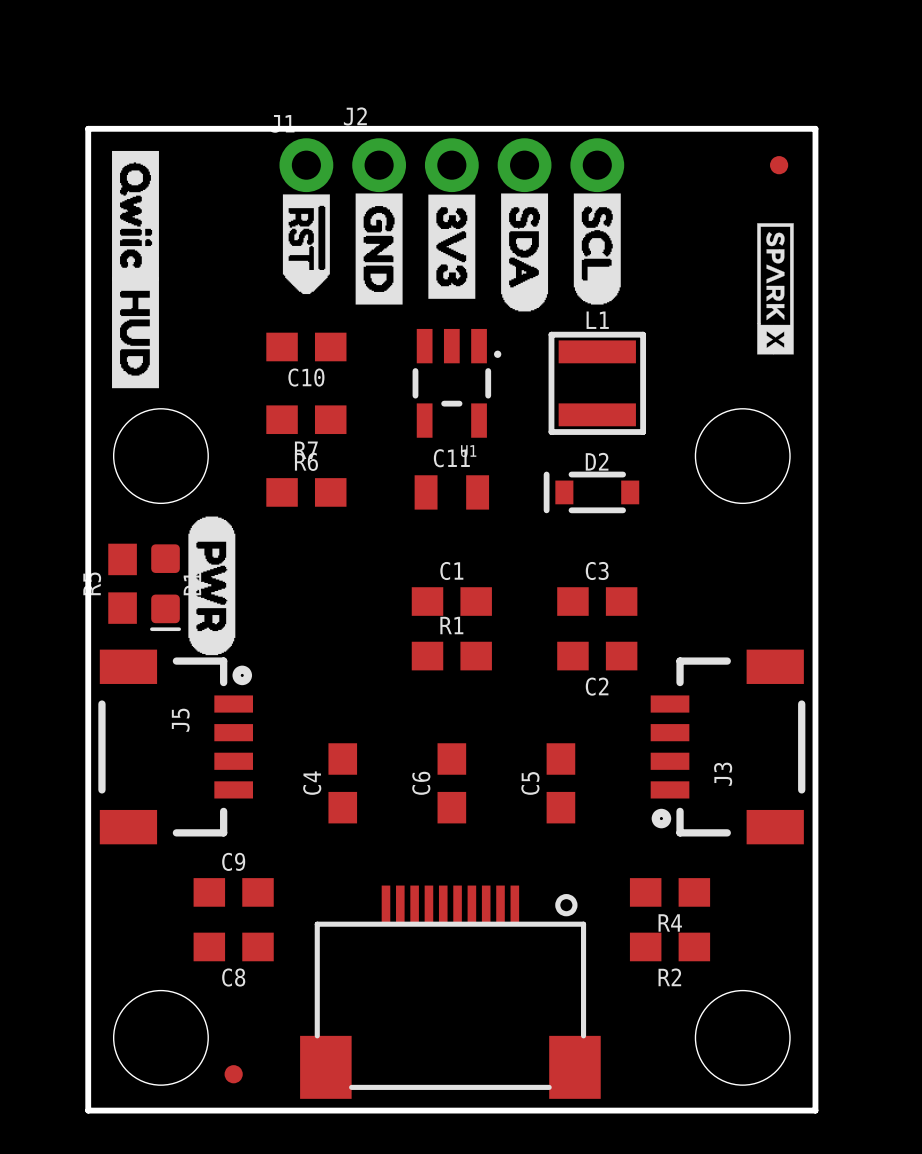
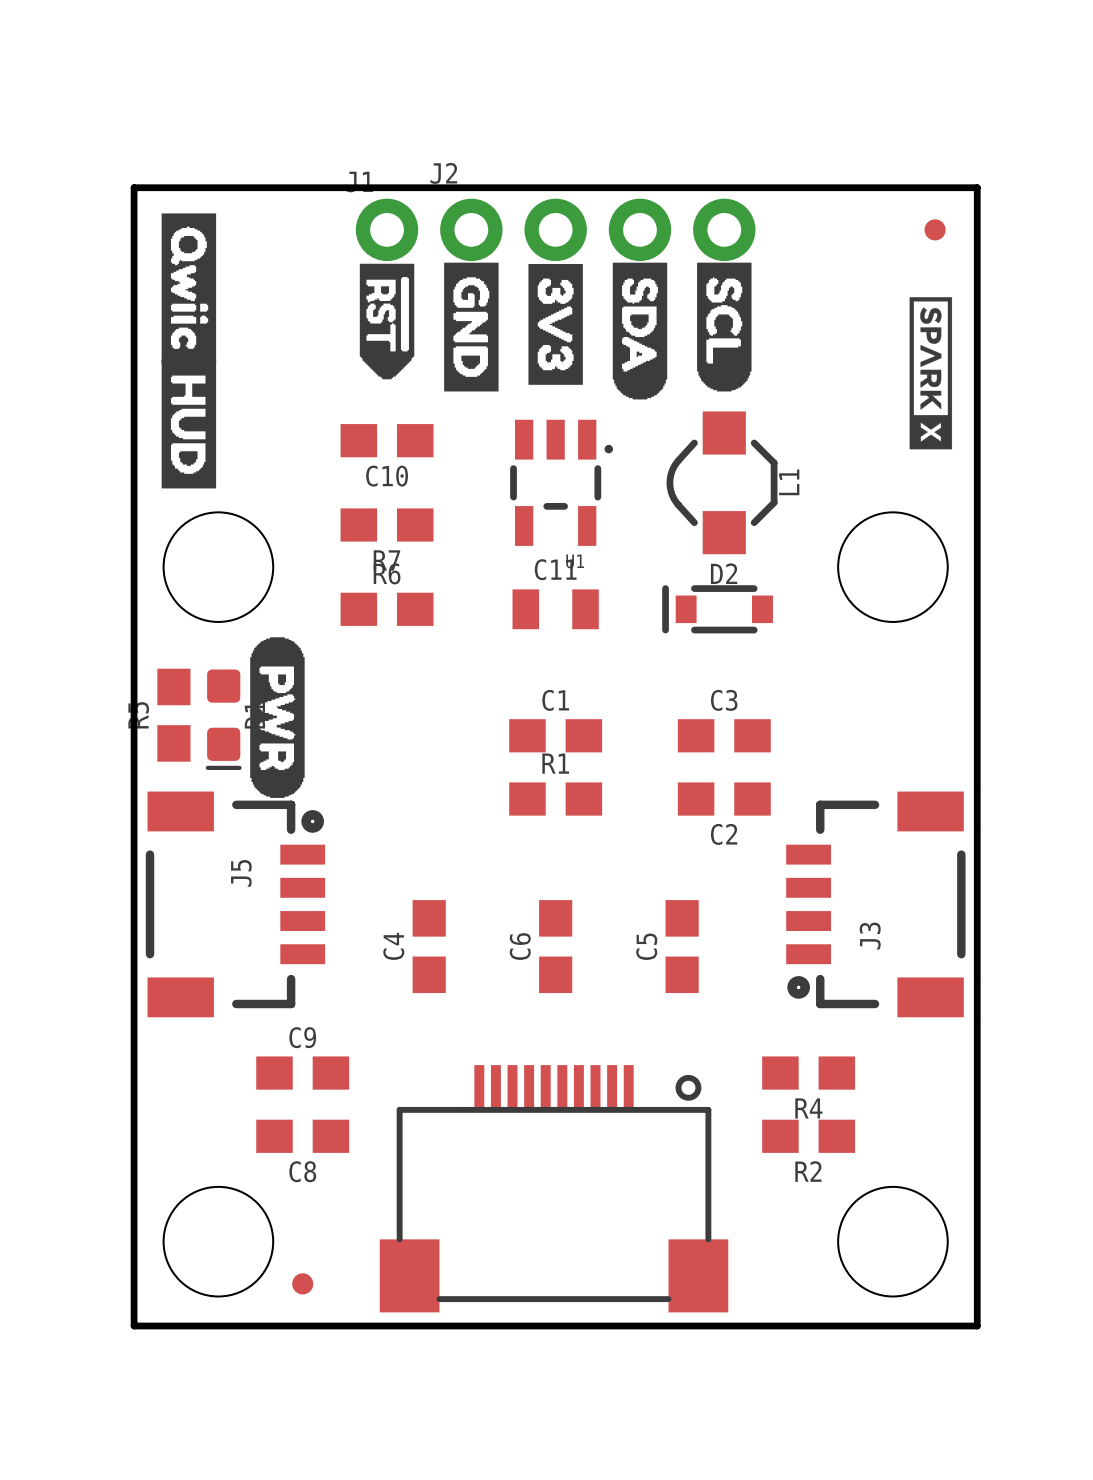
L1 name position: L1 (597, 320) -> L1 (789, 482)
L1 footprint: [548, 331, 647, 435] -> [666, 411, 778, 555]

